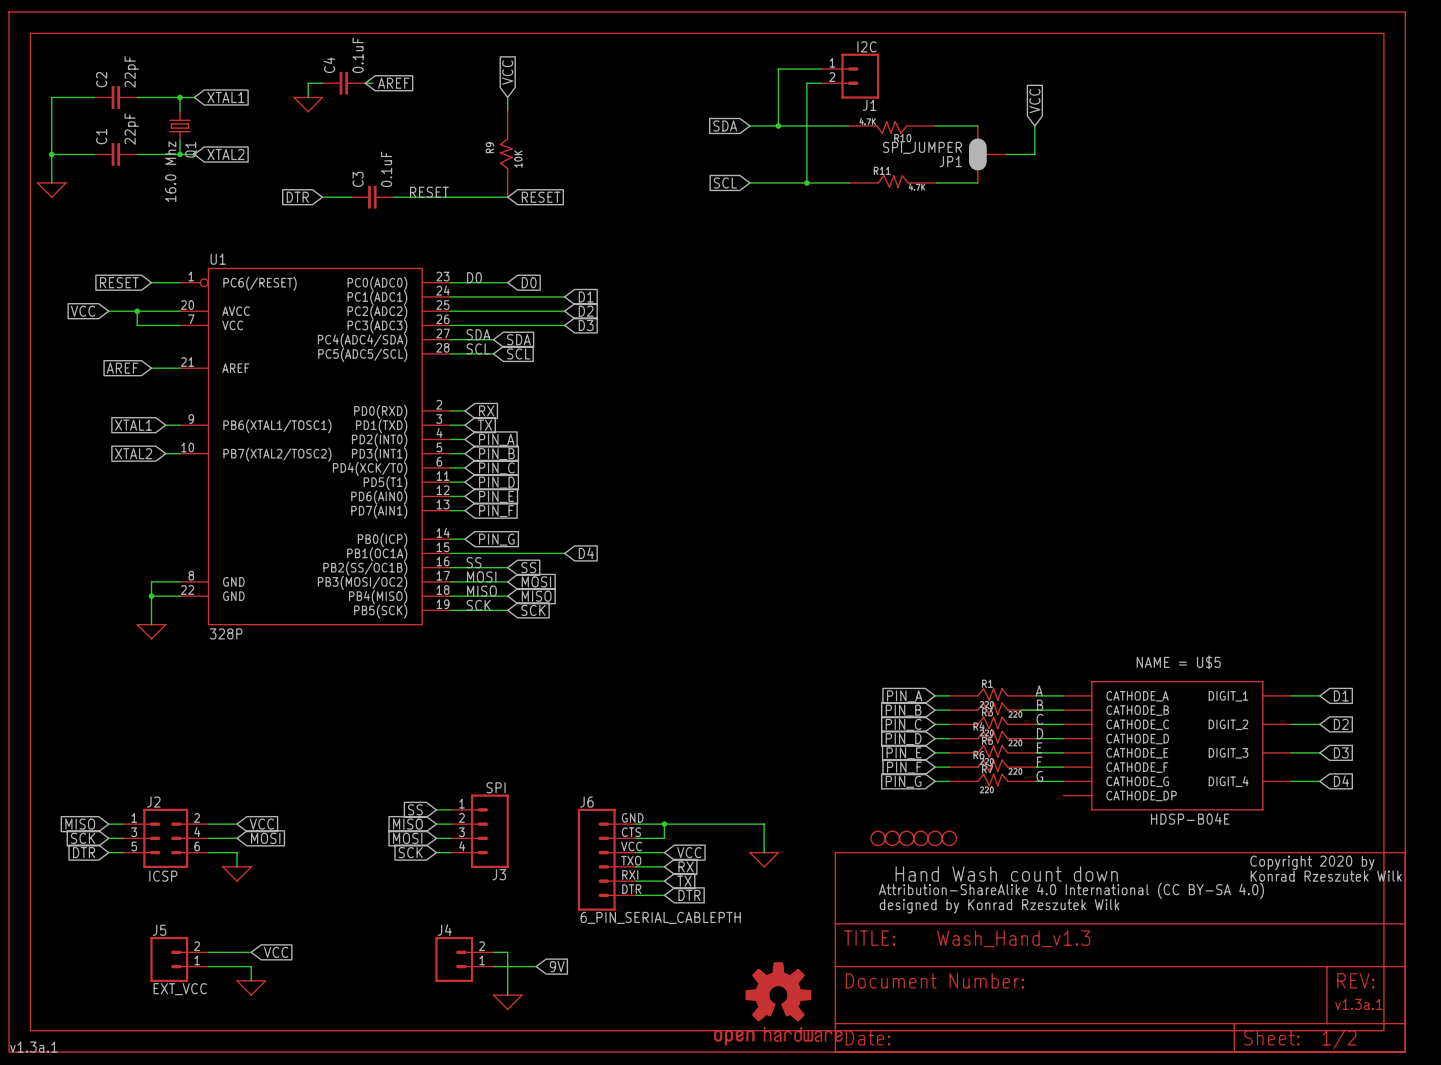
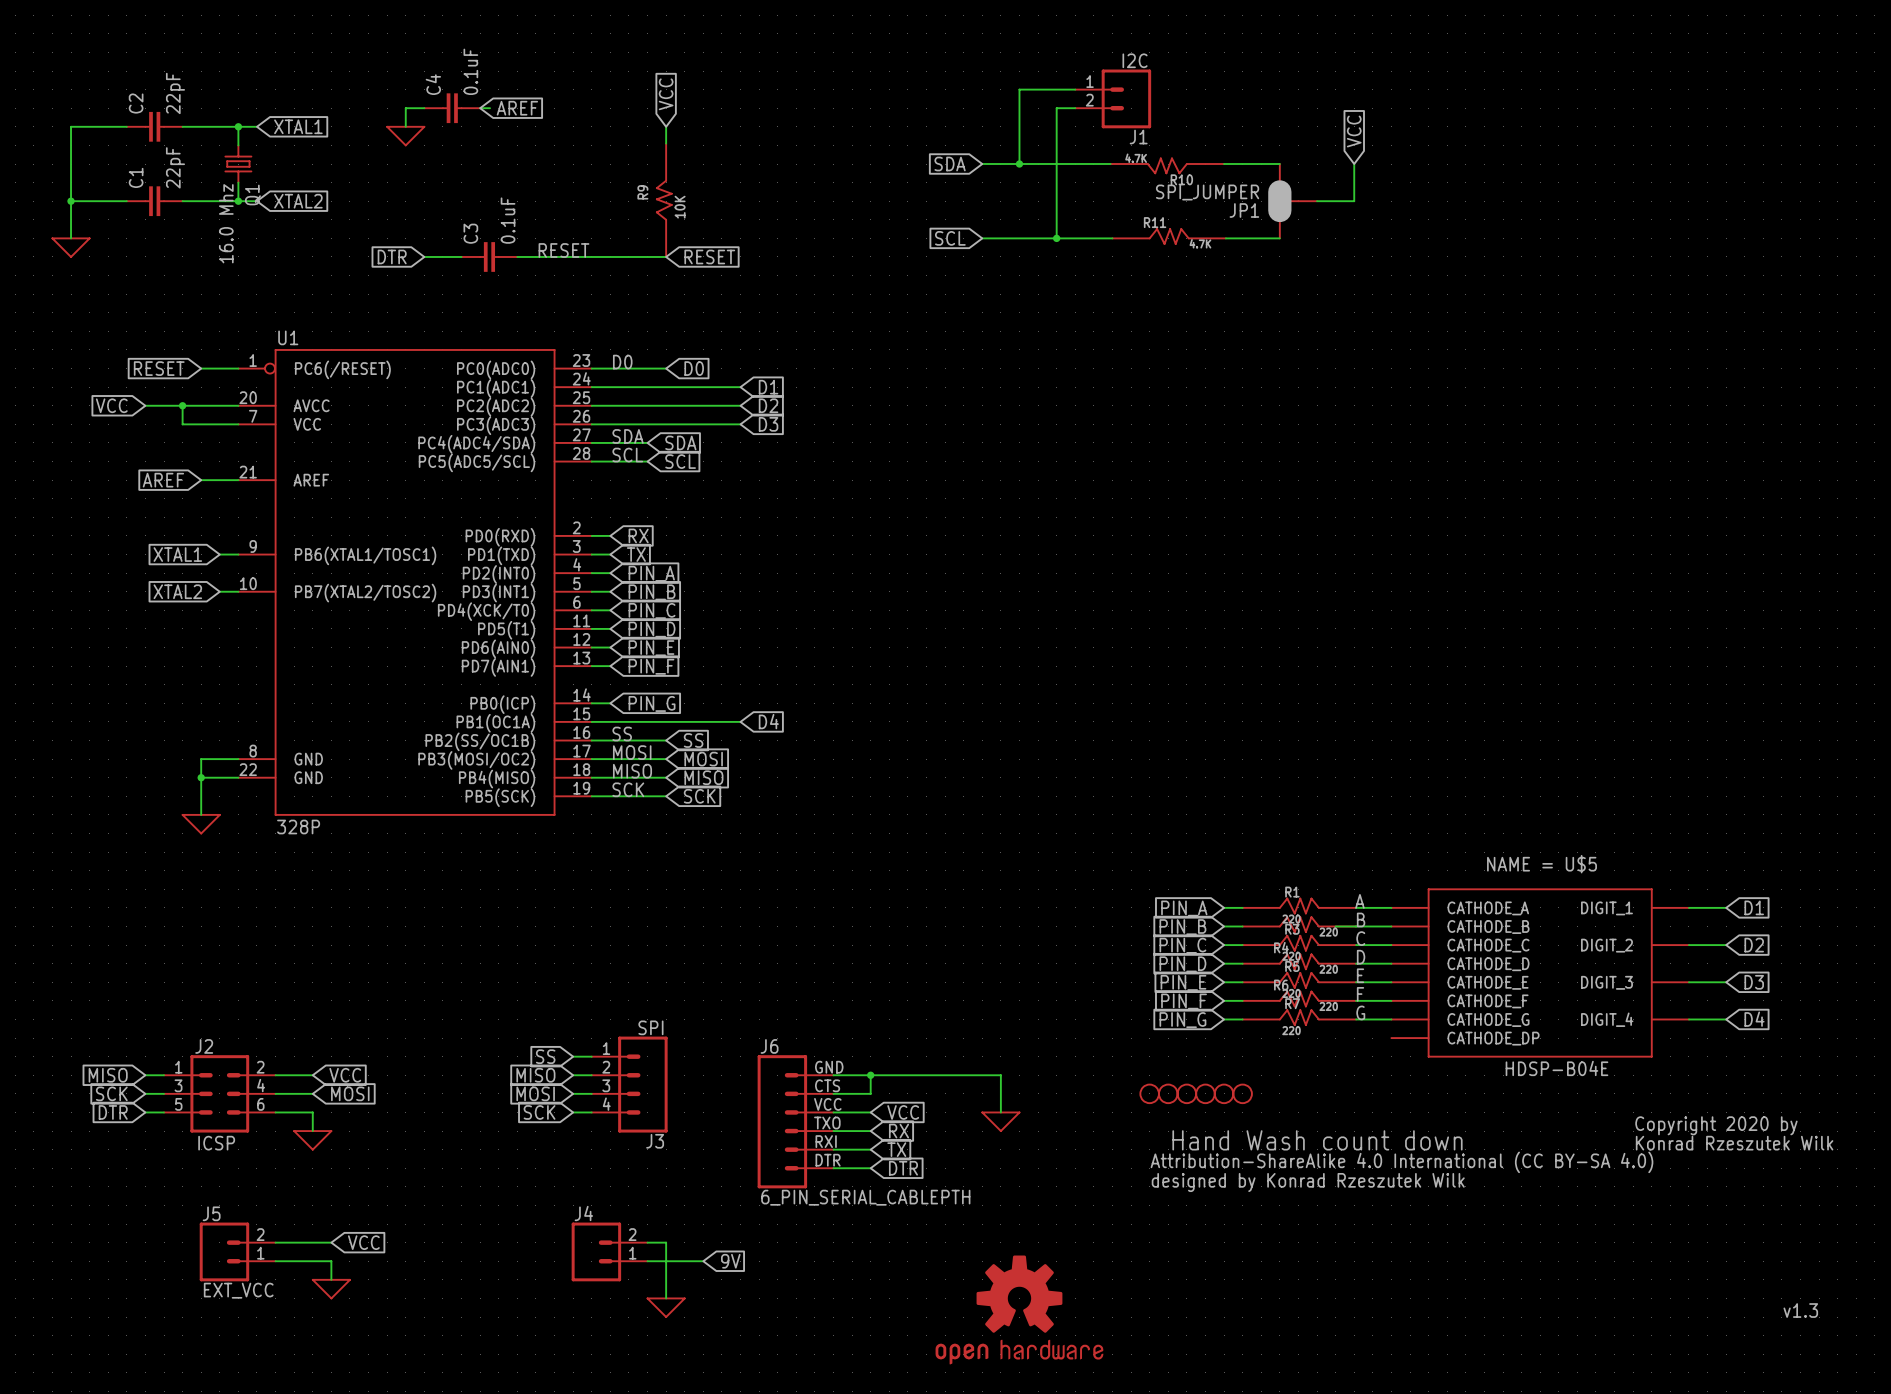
part: (707, 532) -> none
part: (1120, 952) -> none
text: none -> v1.3 (1800, 1310)

